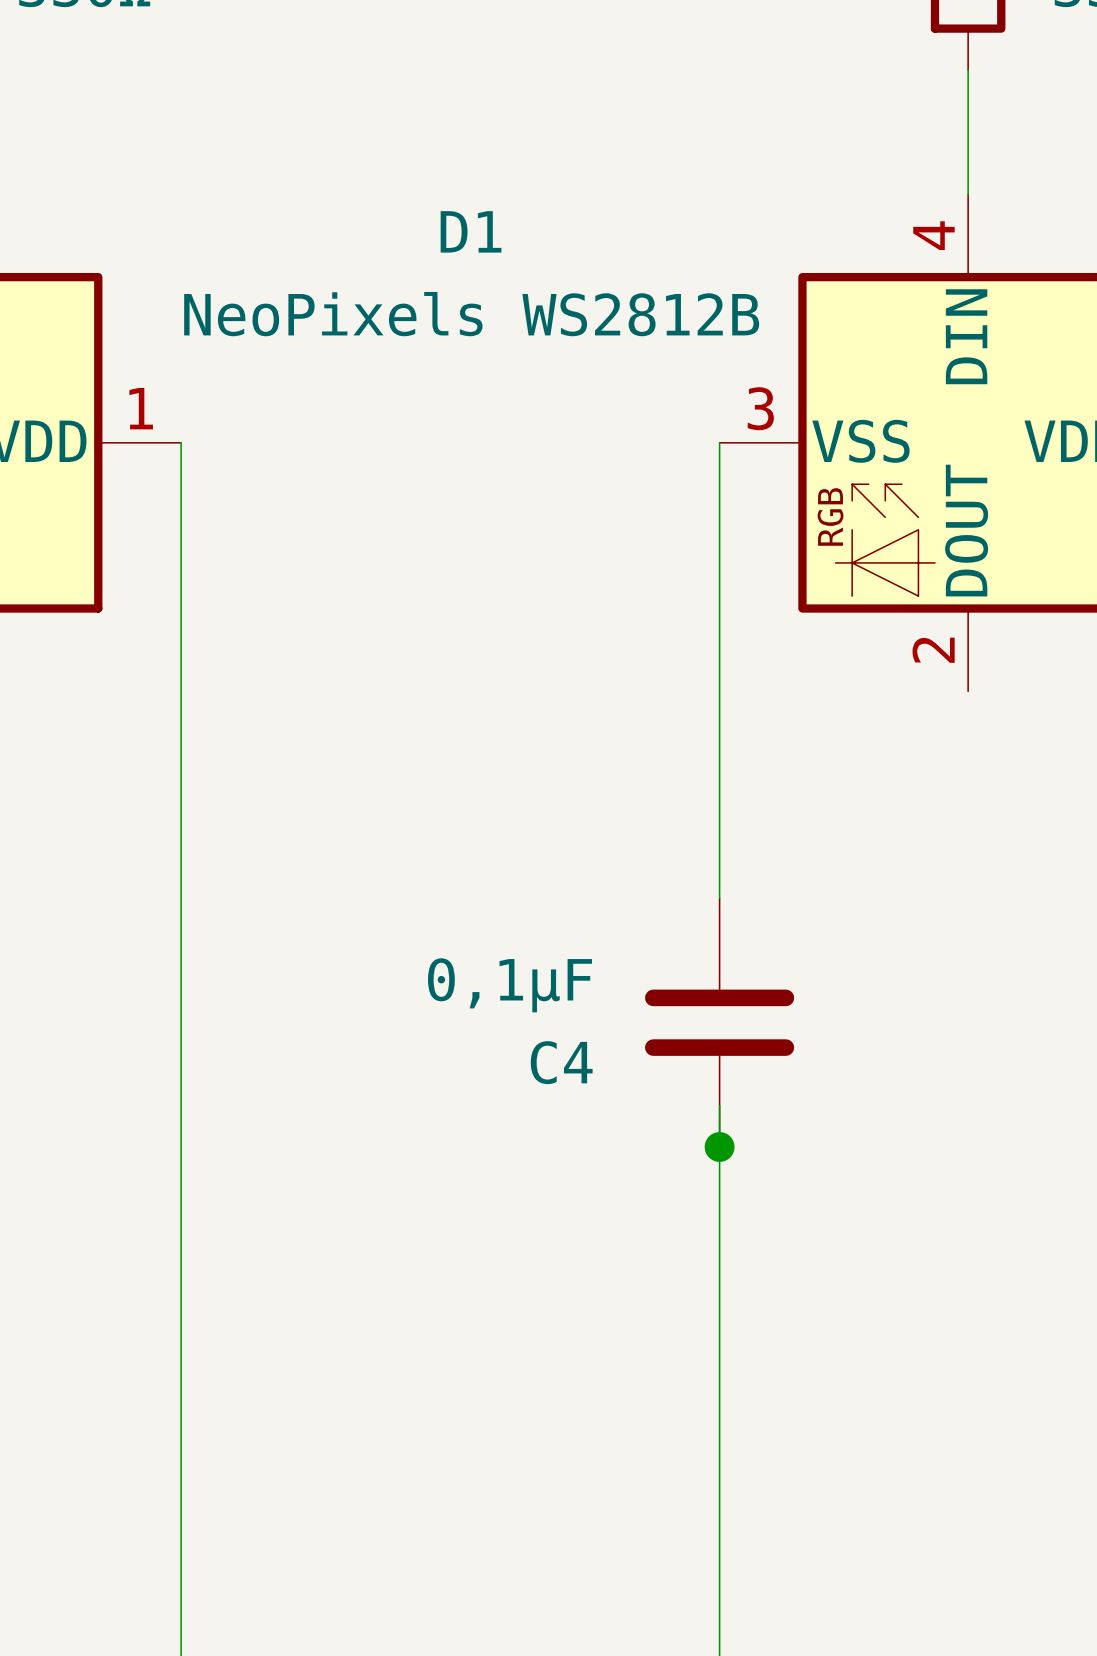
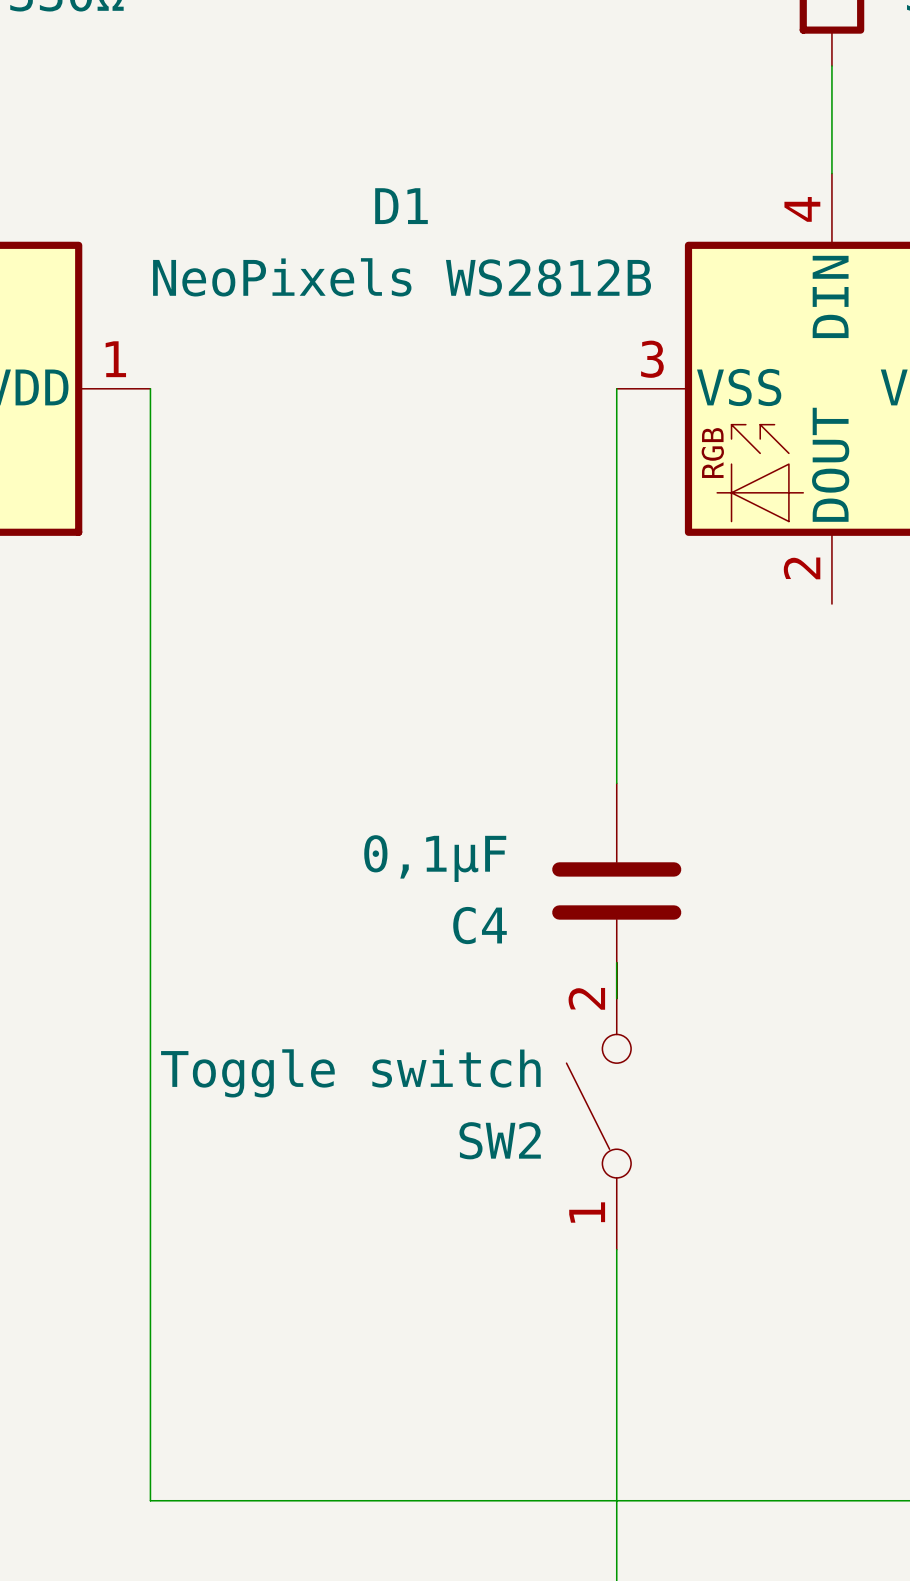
wire: (719, 1147) (719, 1436) -> none
junction: (719, 1147) -> none
SW2: none -> Toggle switch (598, 1106)

